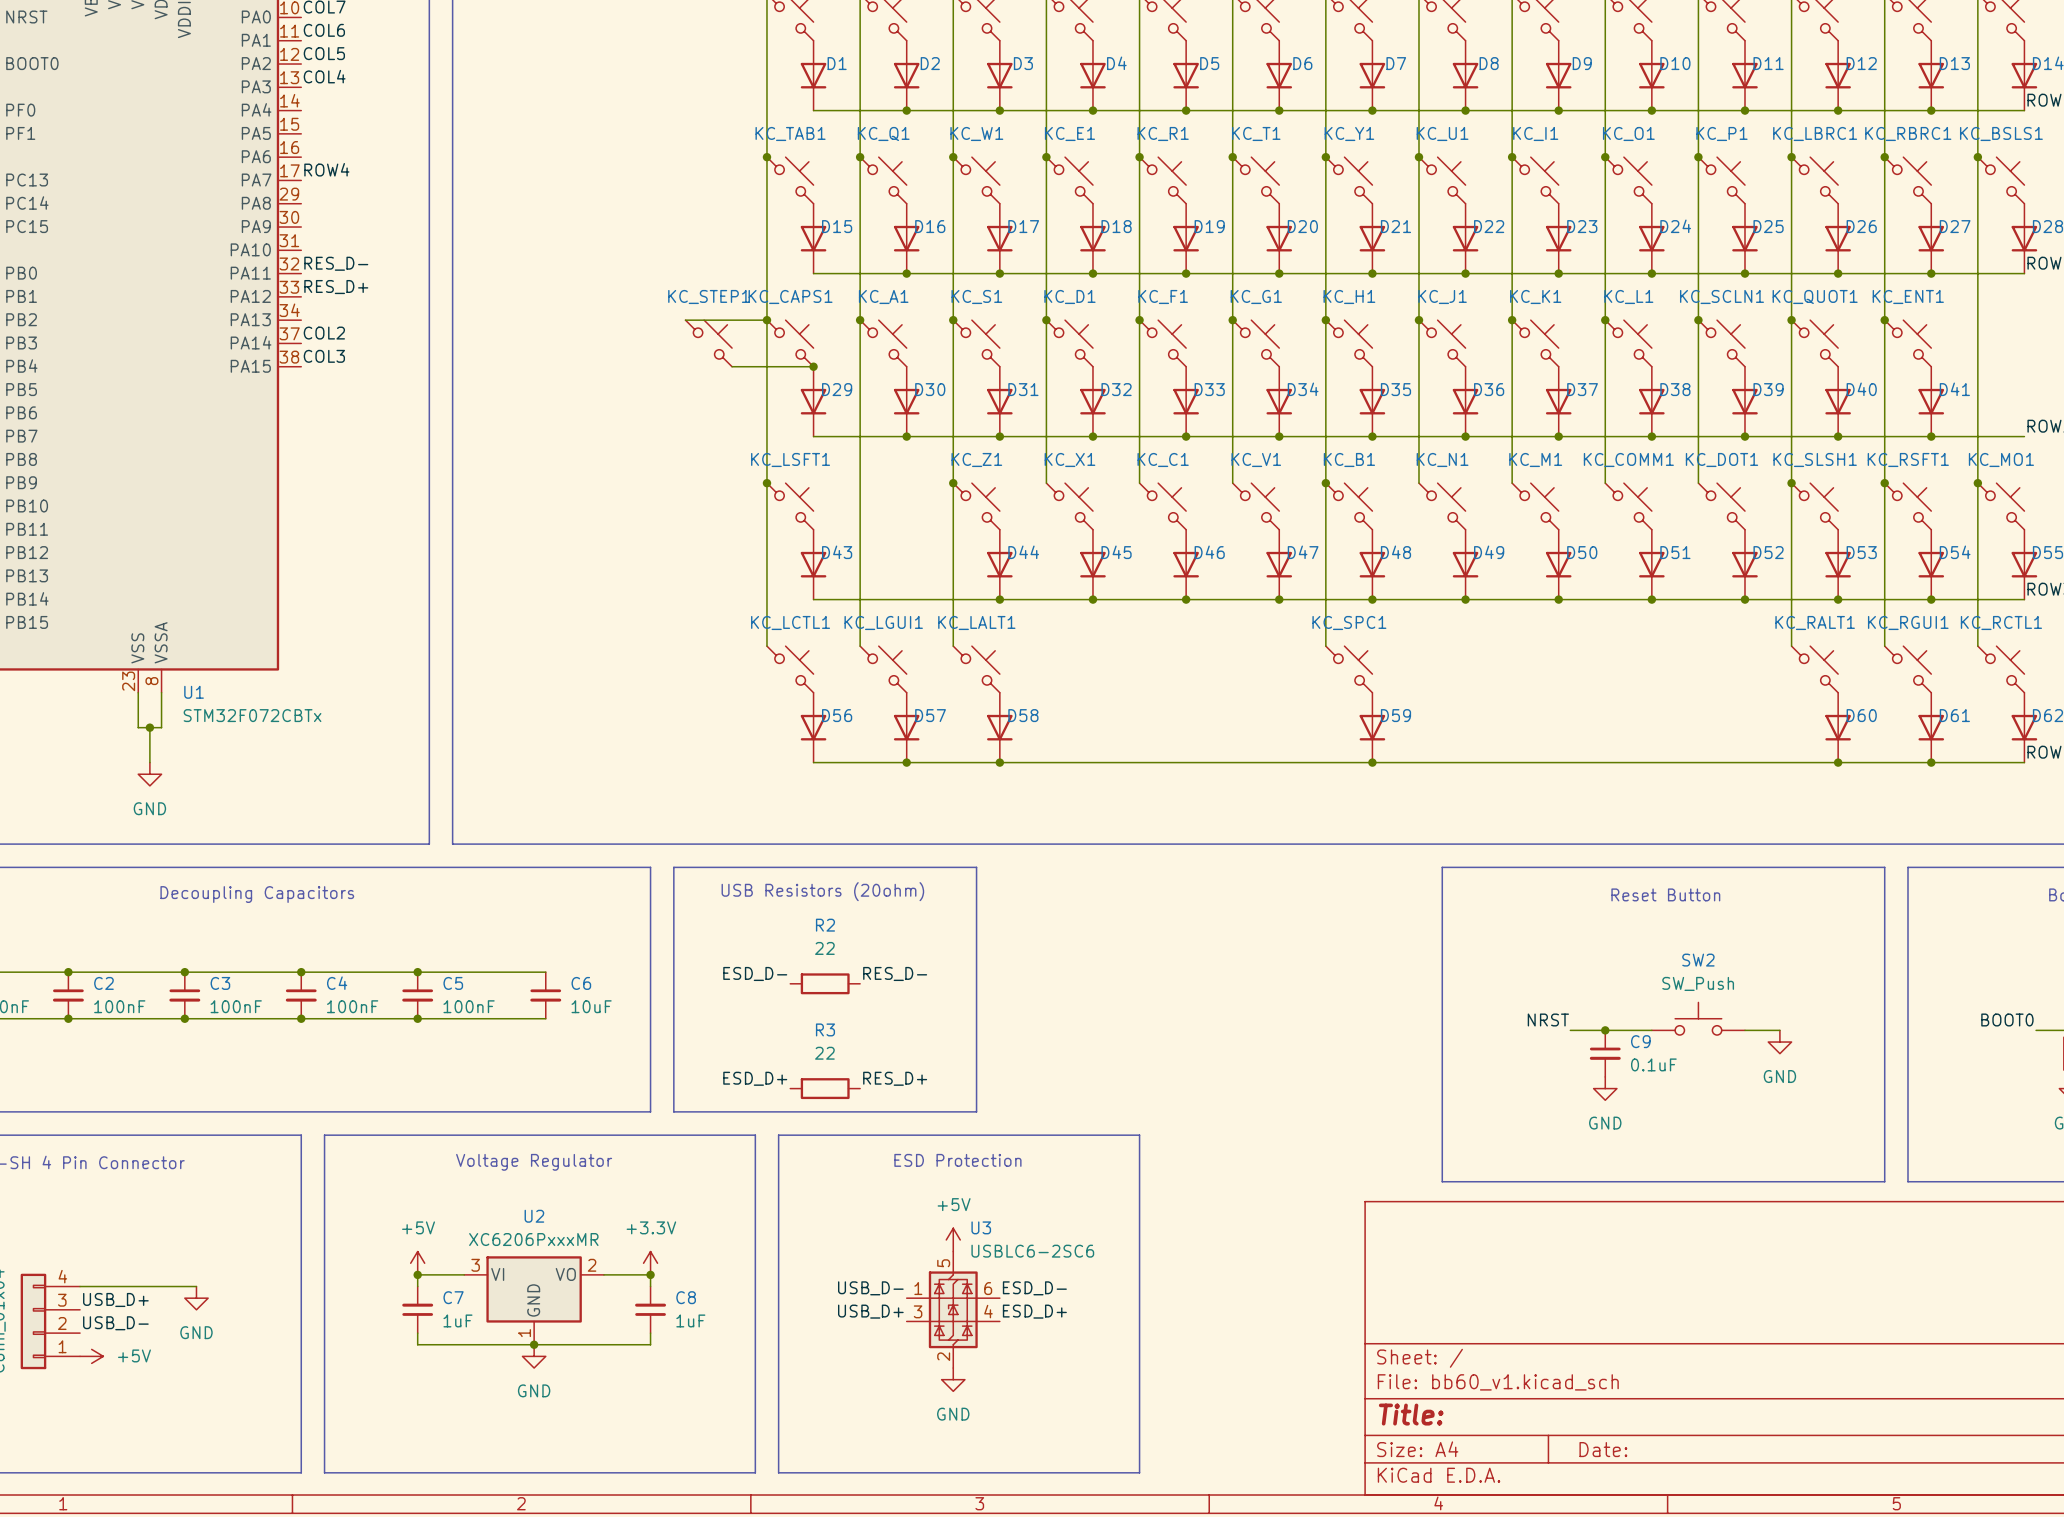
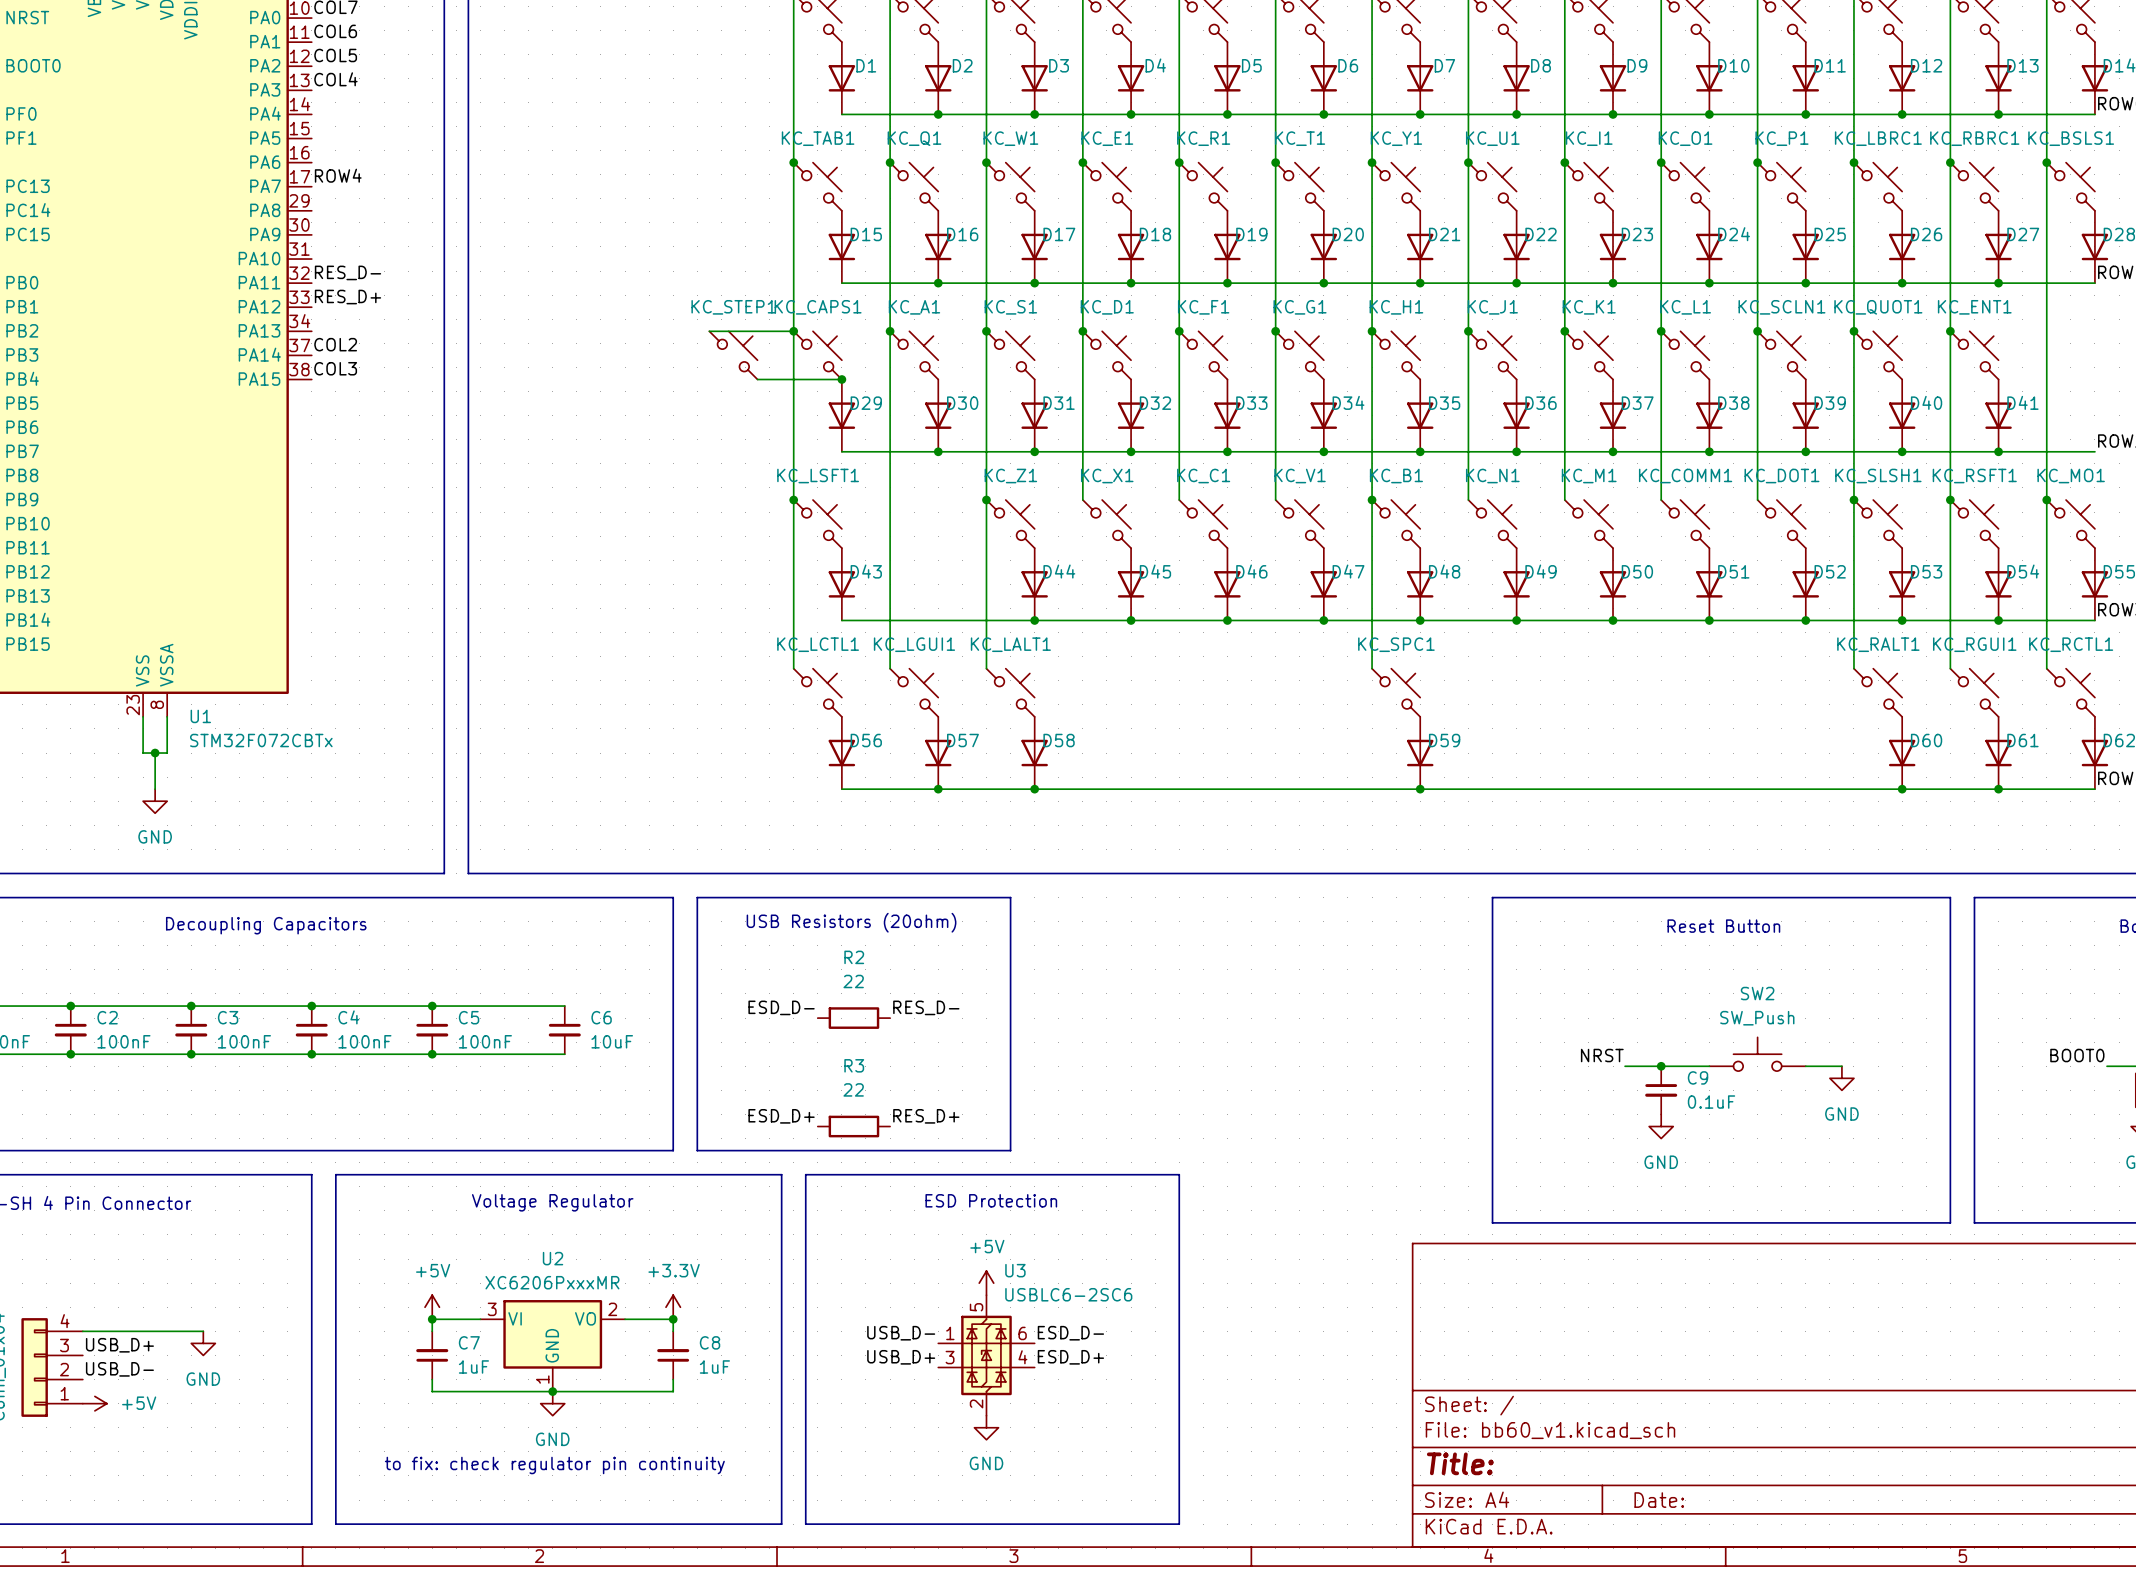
text: none -> to fix: check regulator pin continuity (554, 1465)

